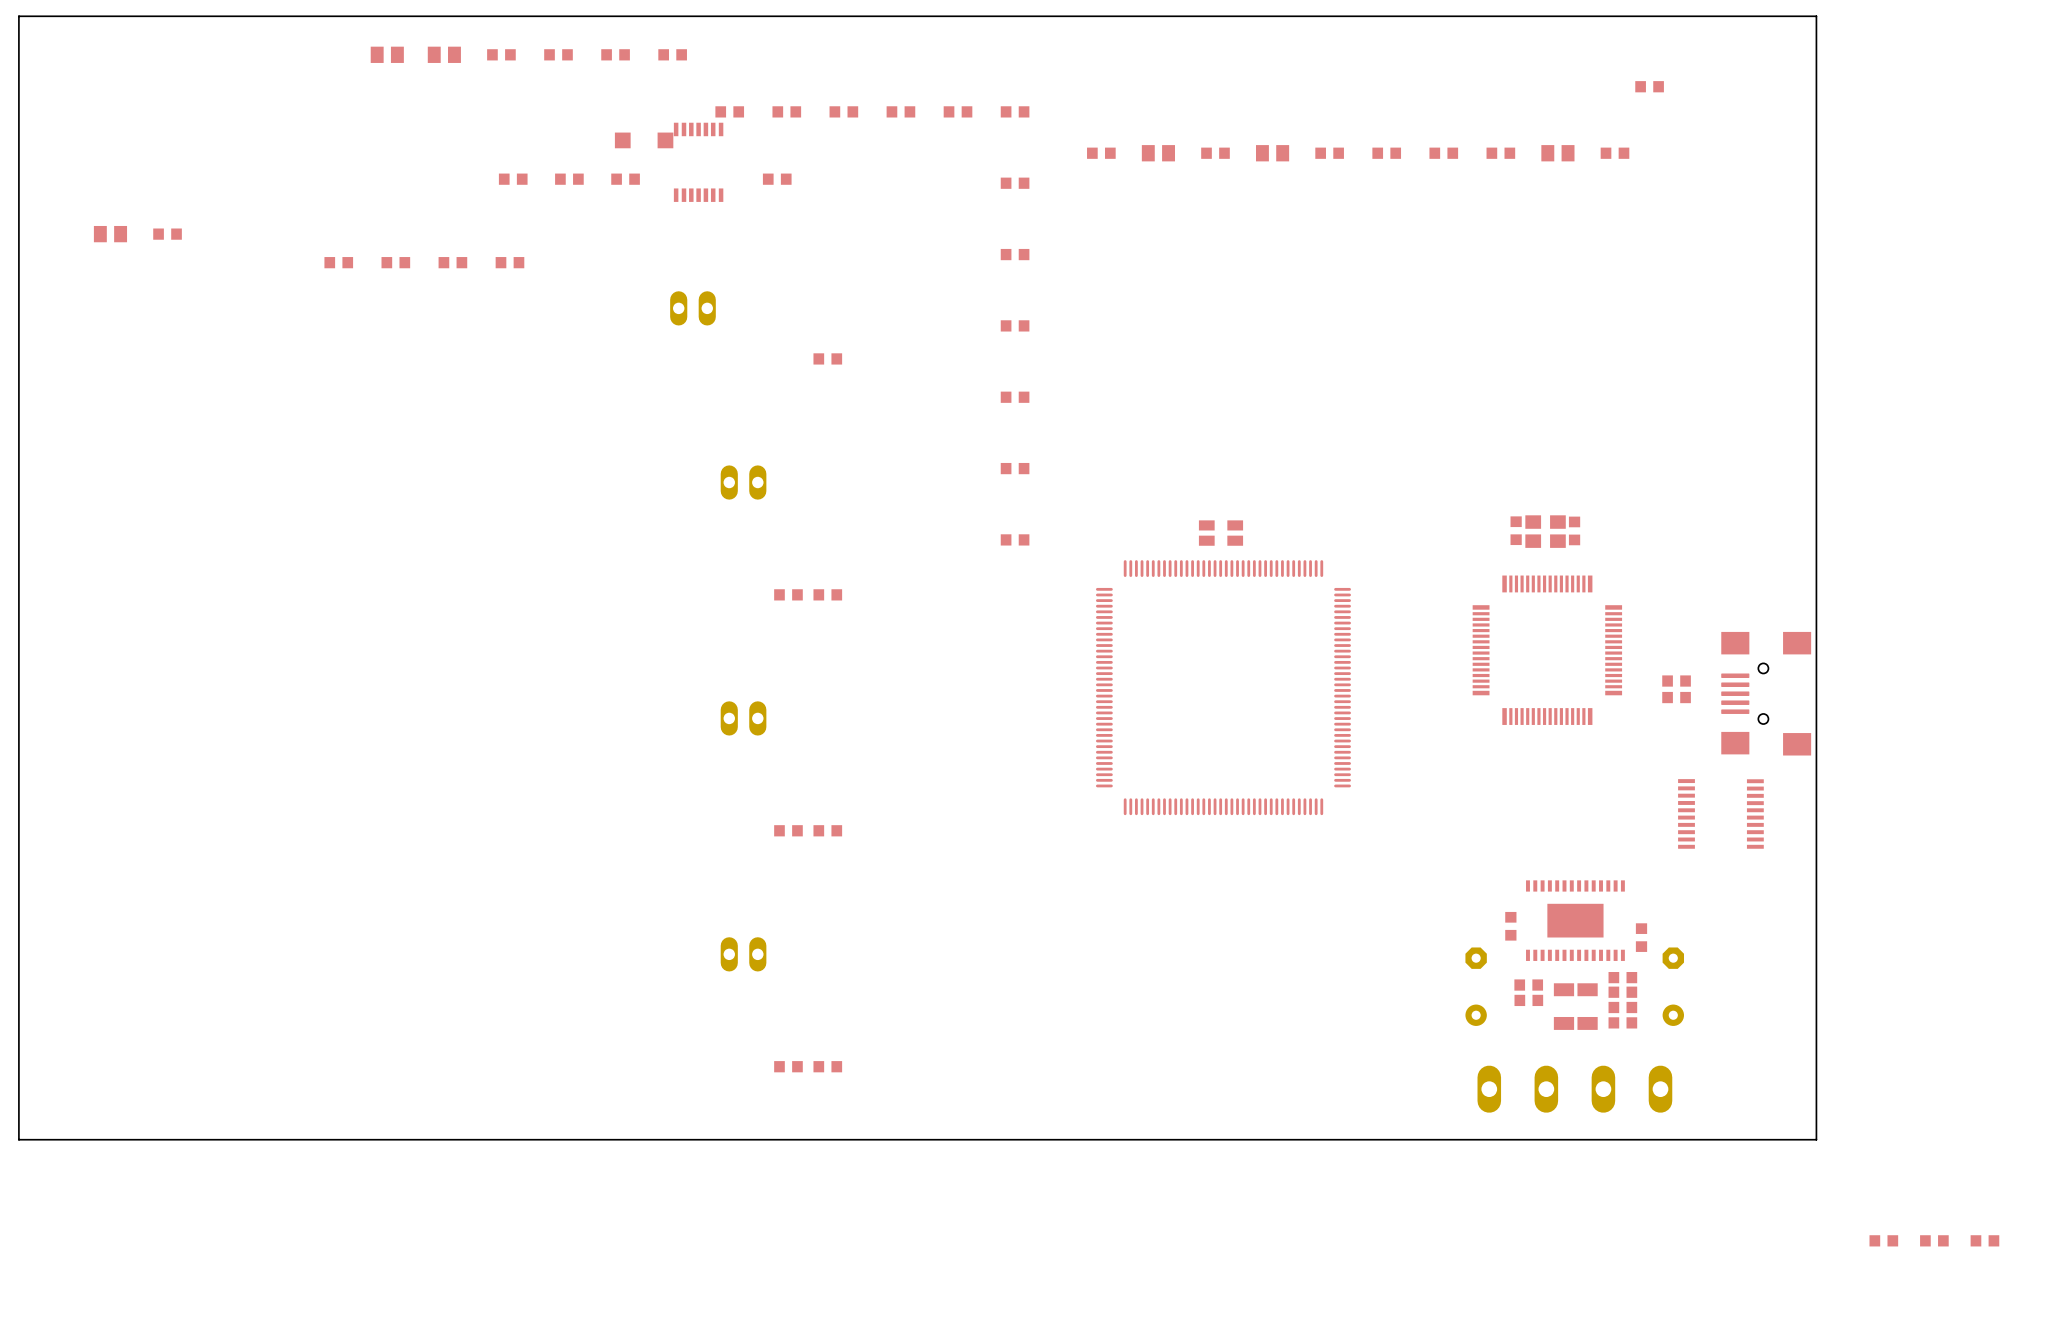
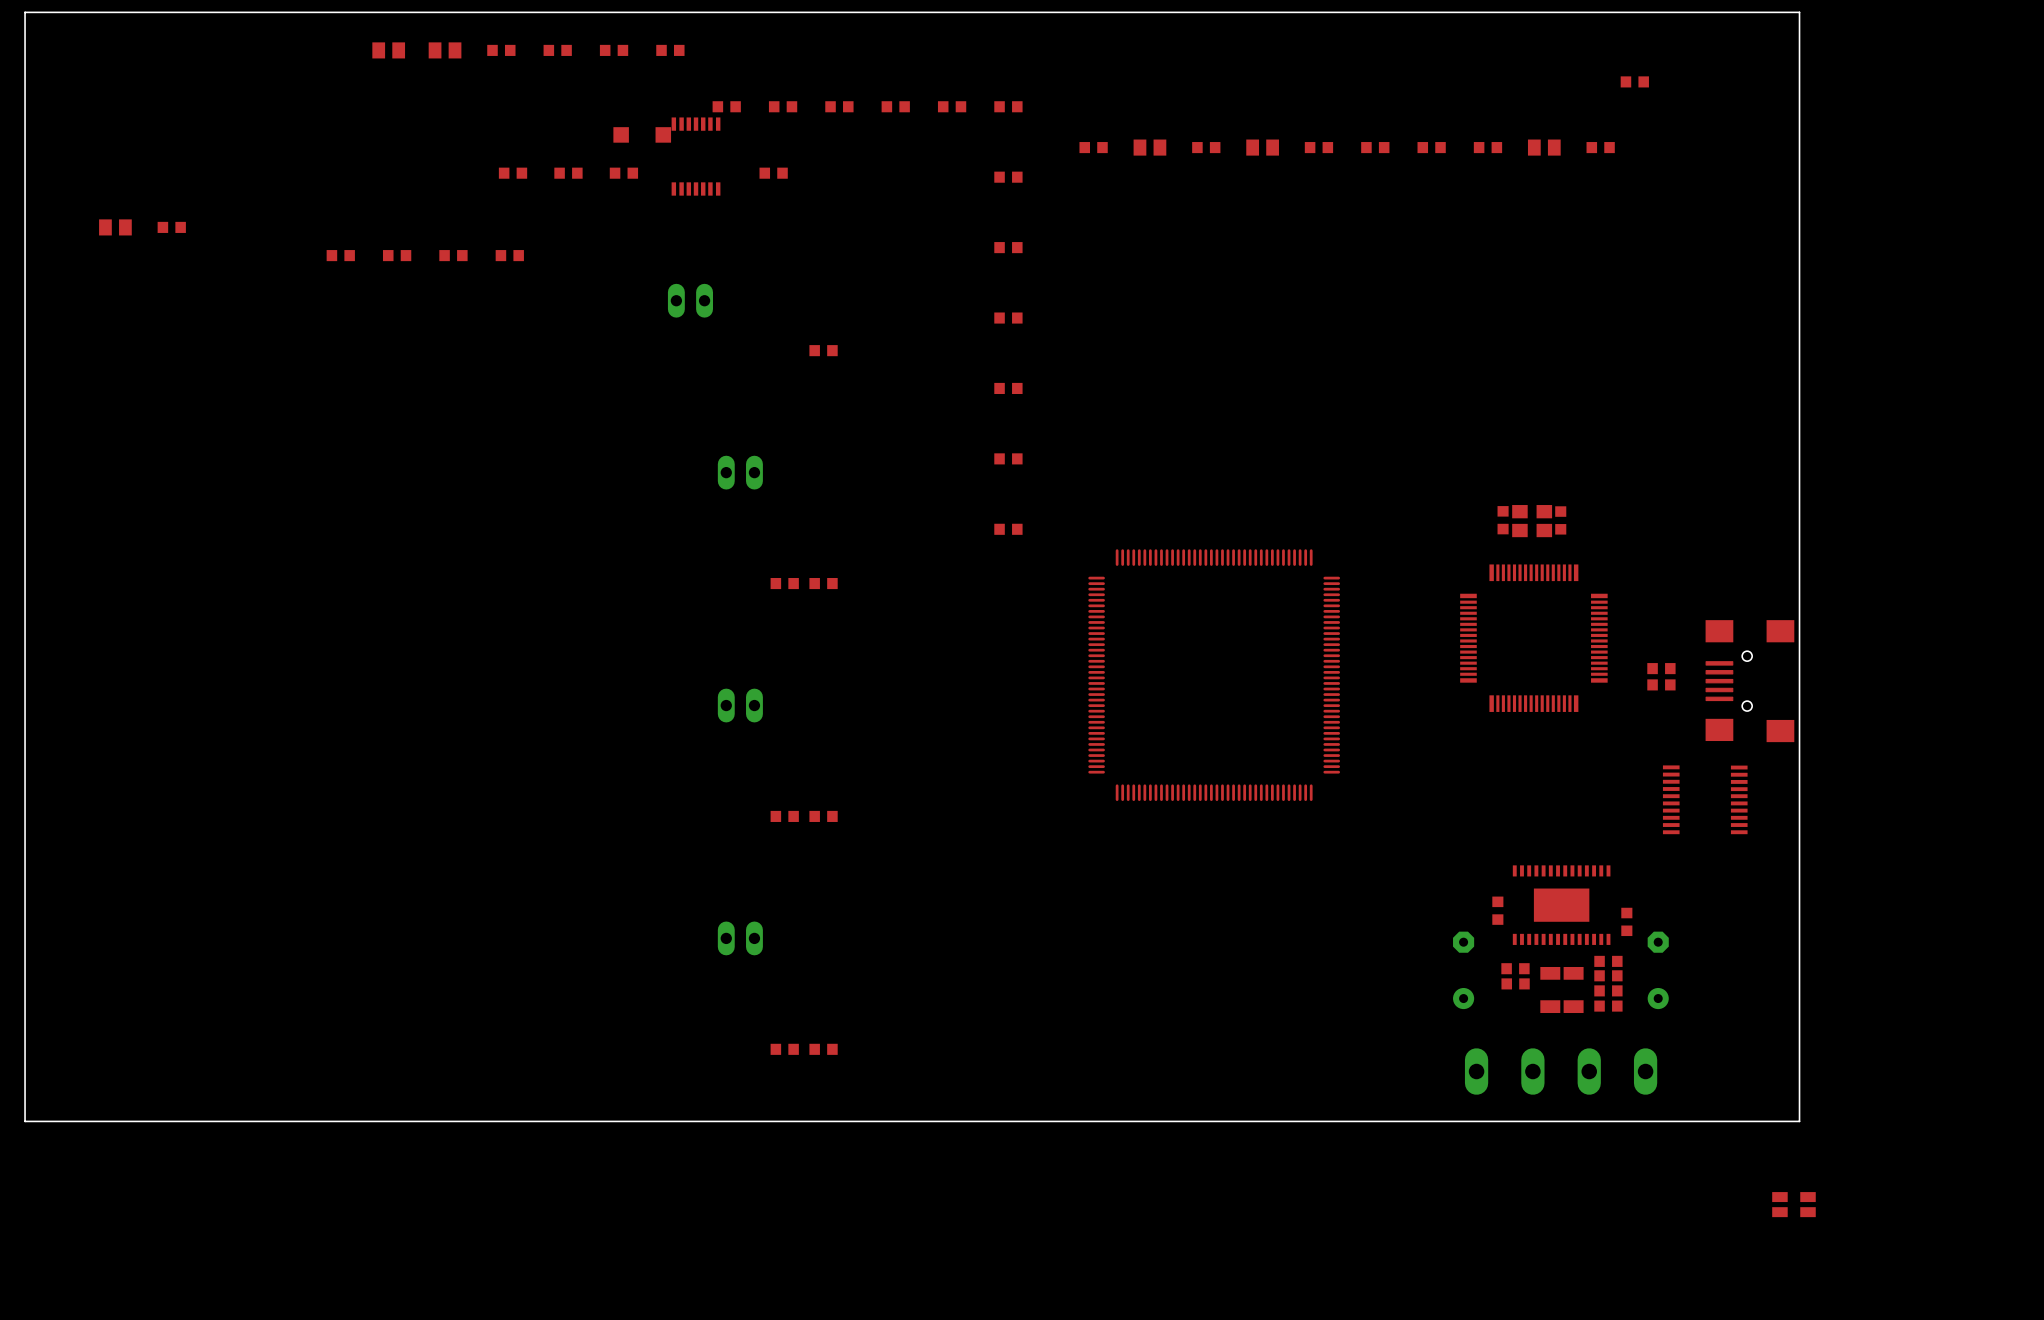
part: (1221, 533) -> none
part: none -> (1793, 1204)
part: (1883, 1240) -> none
part: (1934, 1240) -> none
part: (1984, 1240) -> none

